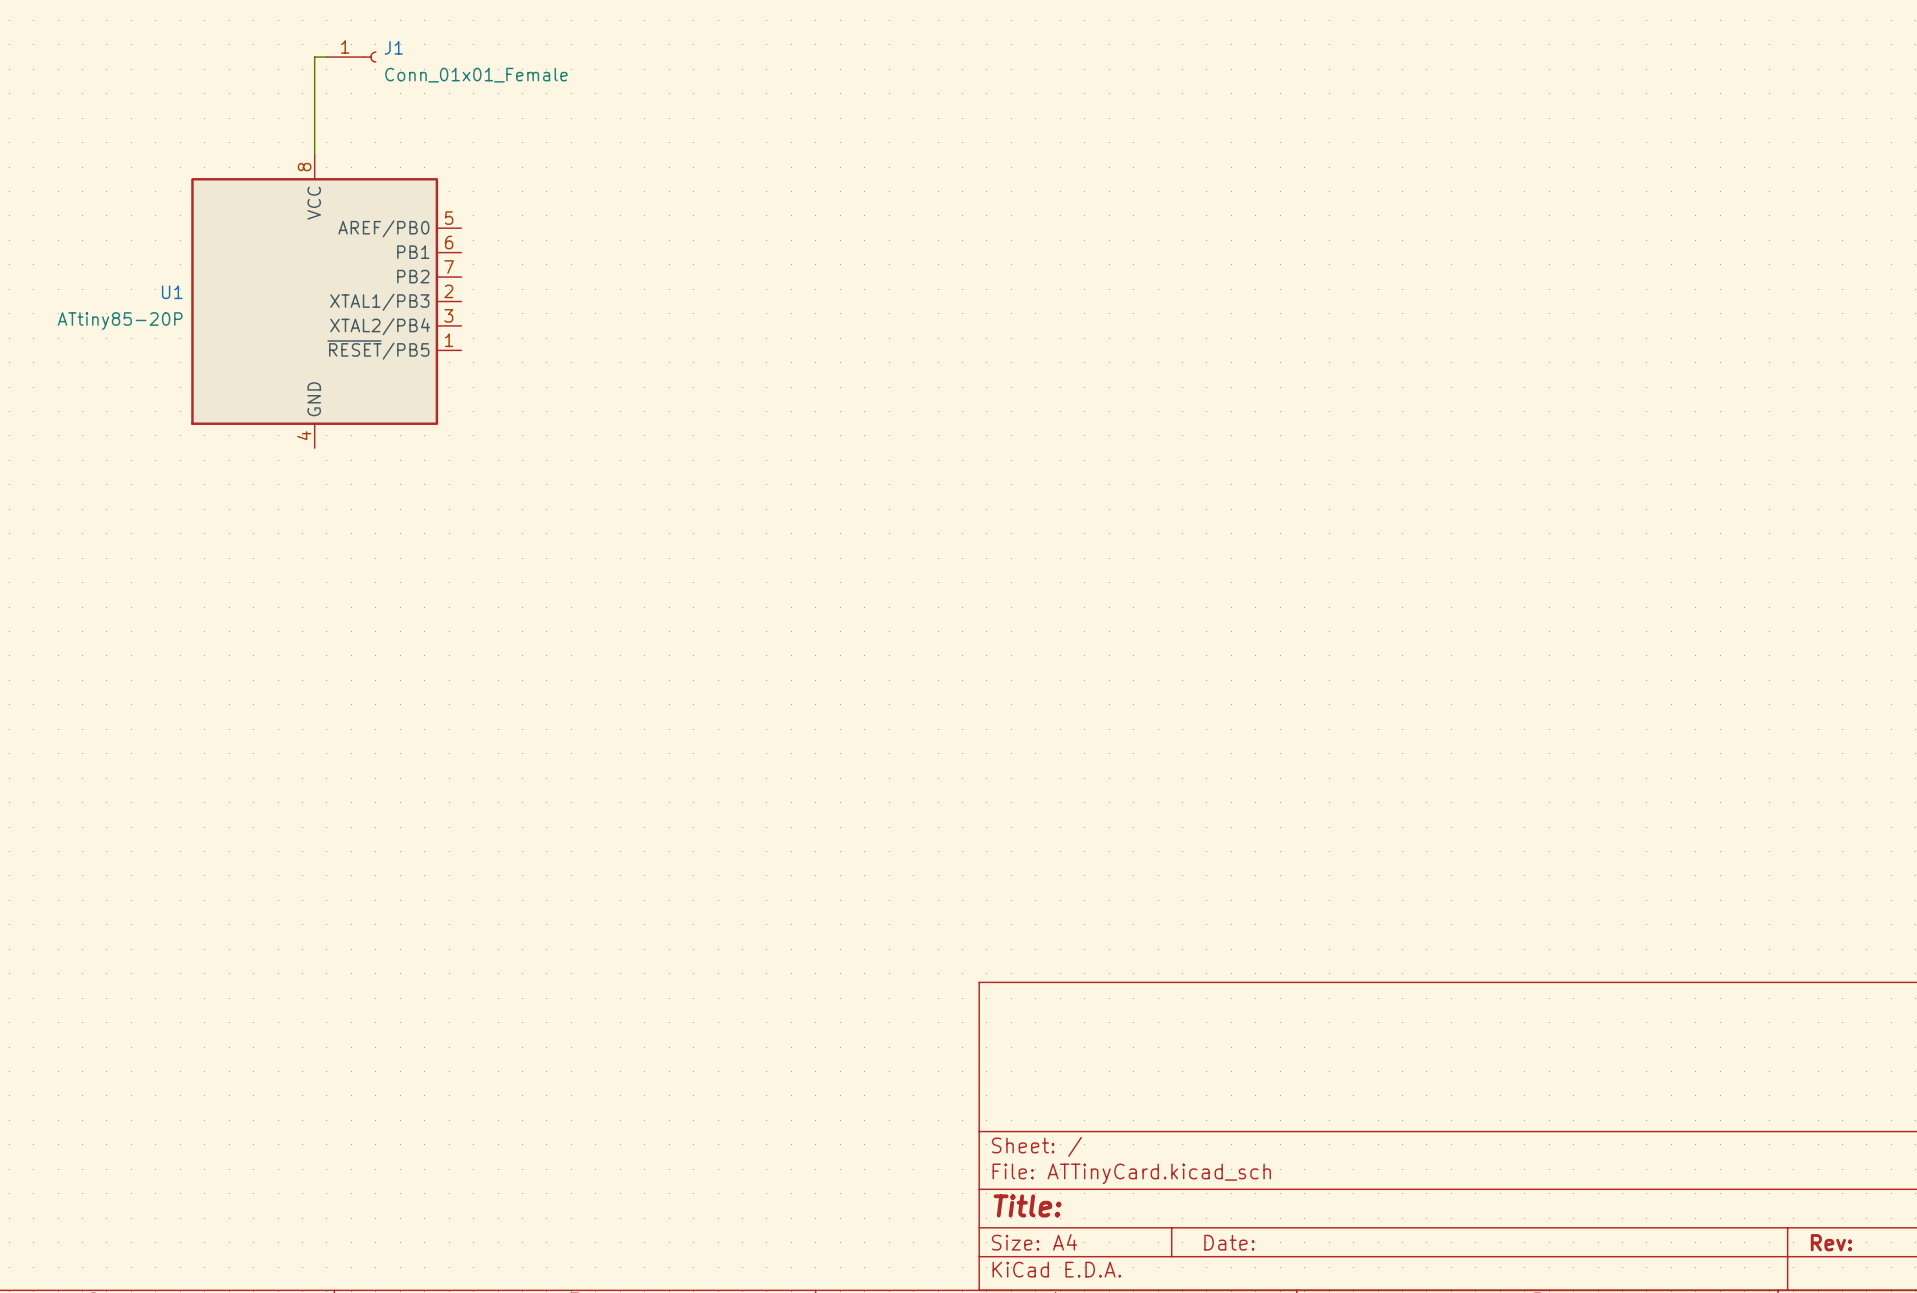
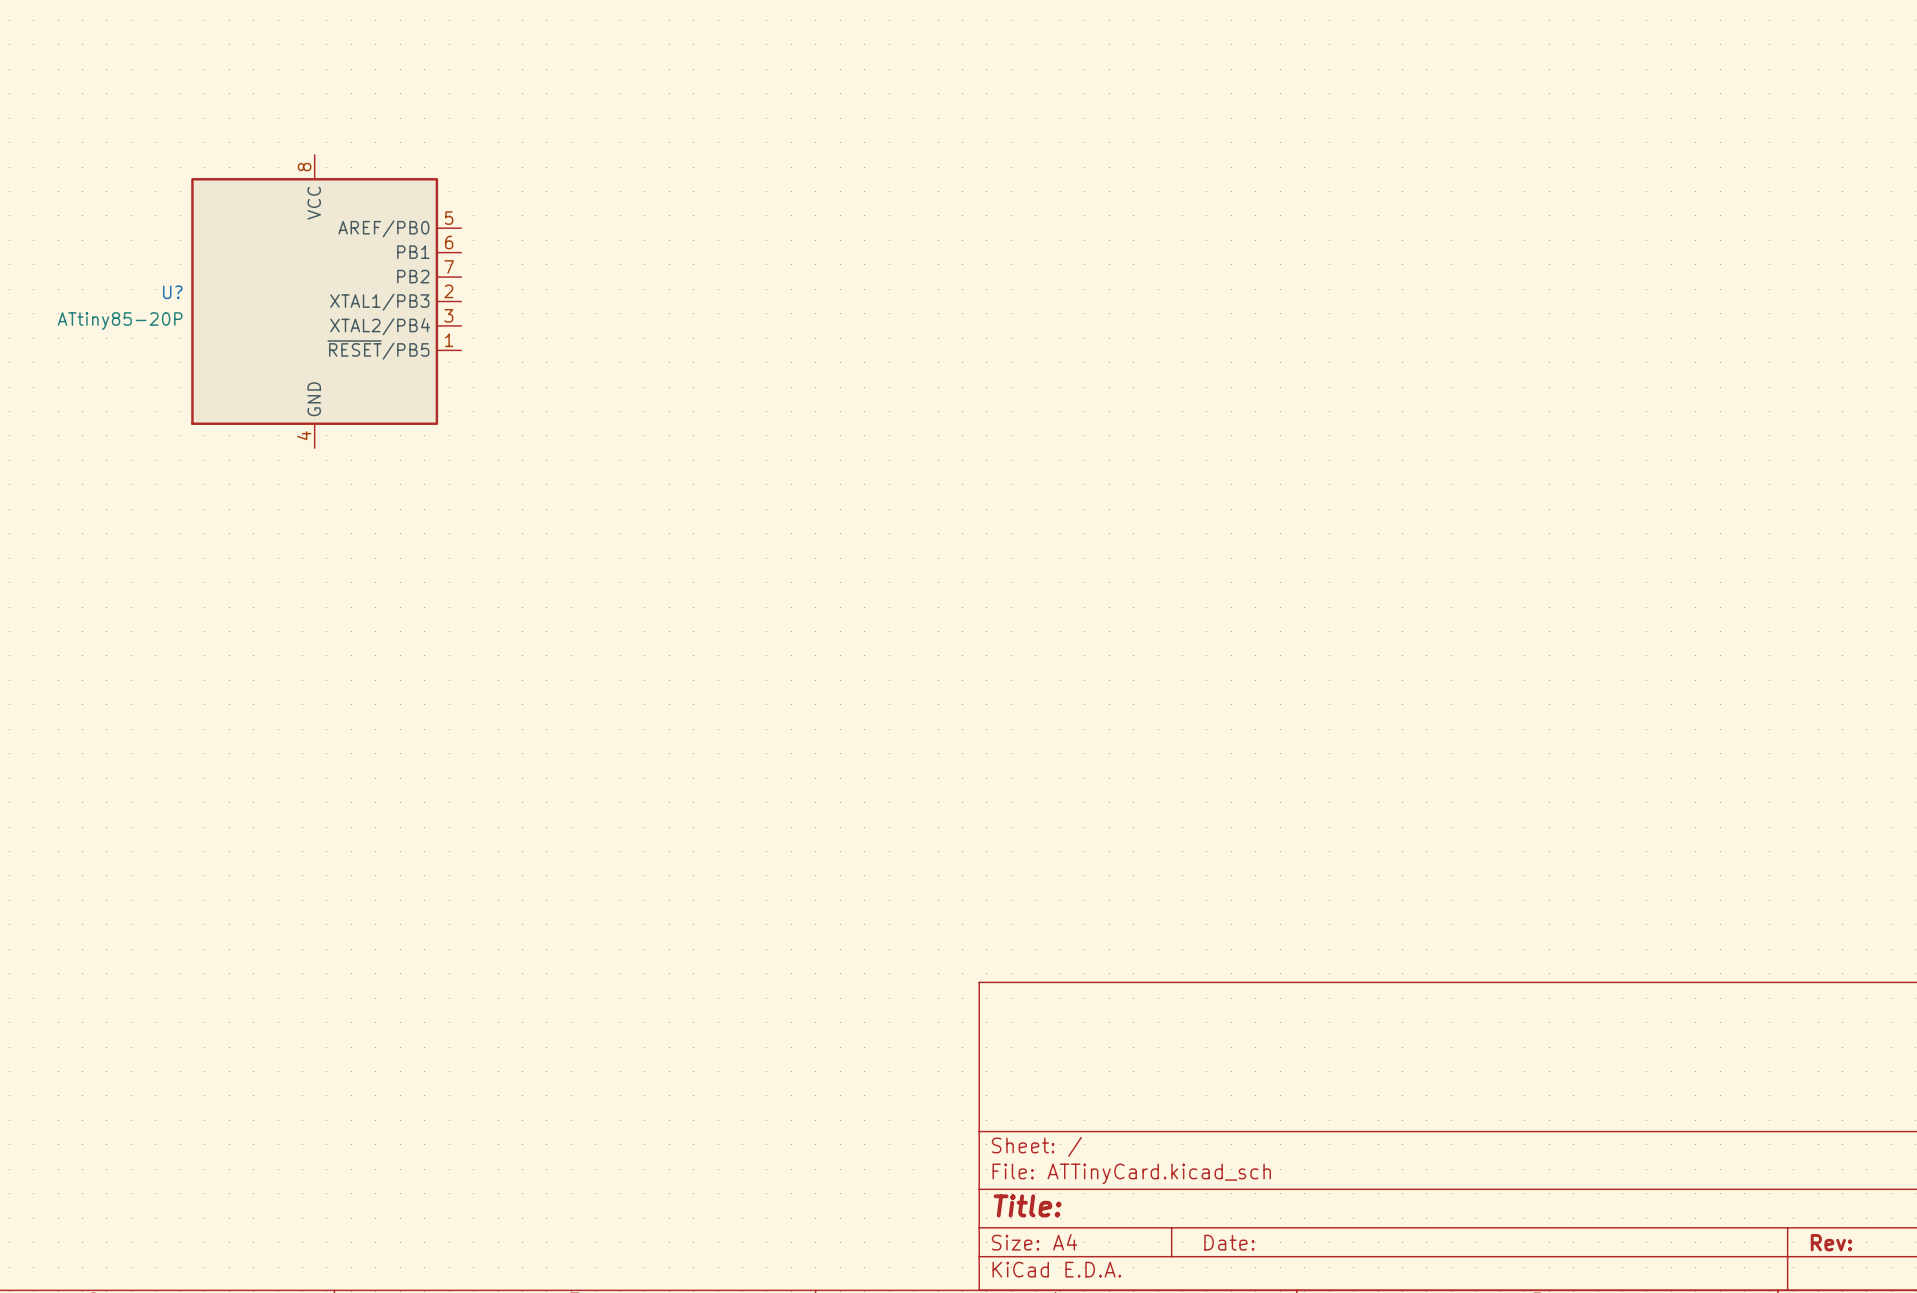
wire: (326, 57) (314, 57) (314, 154) -> none
J1: Conn_01x01_Female (351, 57) -> none
U1 name: U1 (172, 292) -> U? (172, 292)

